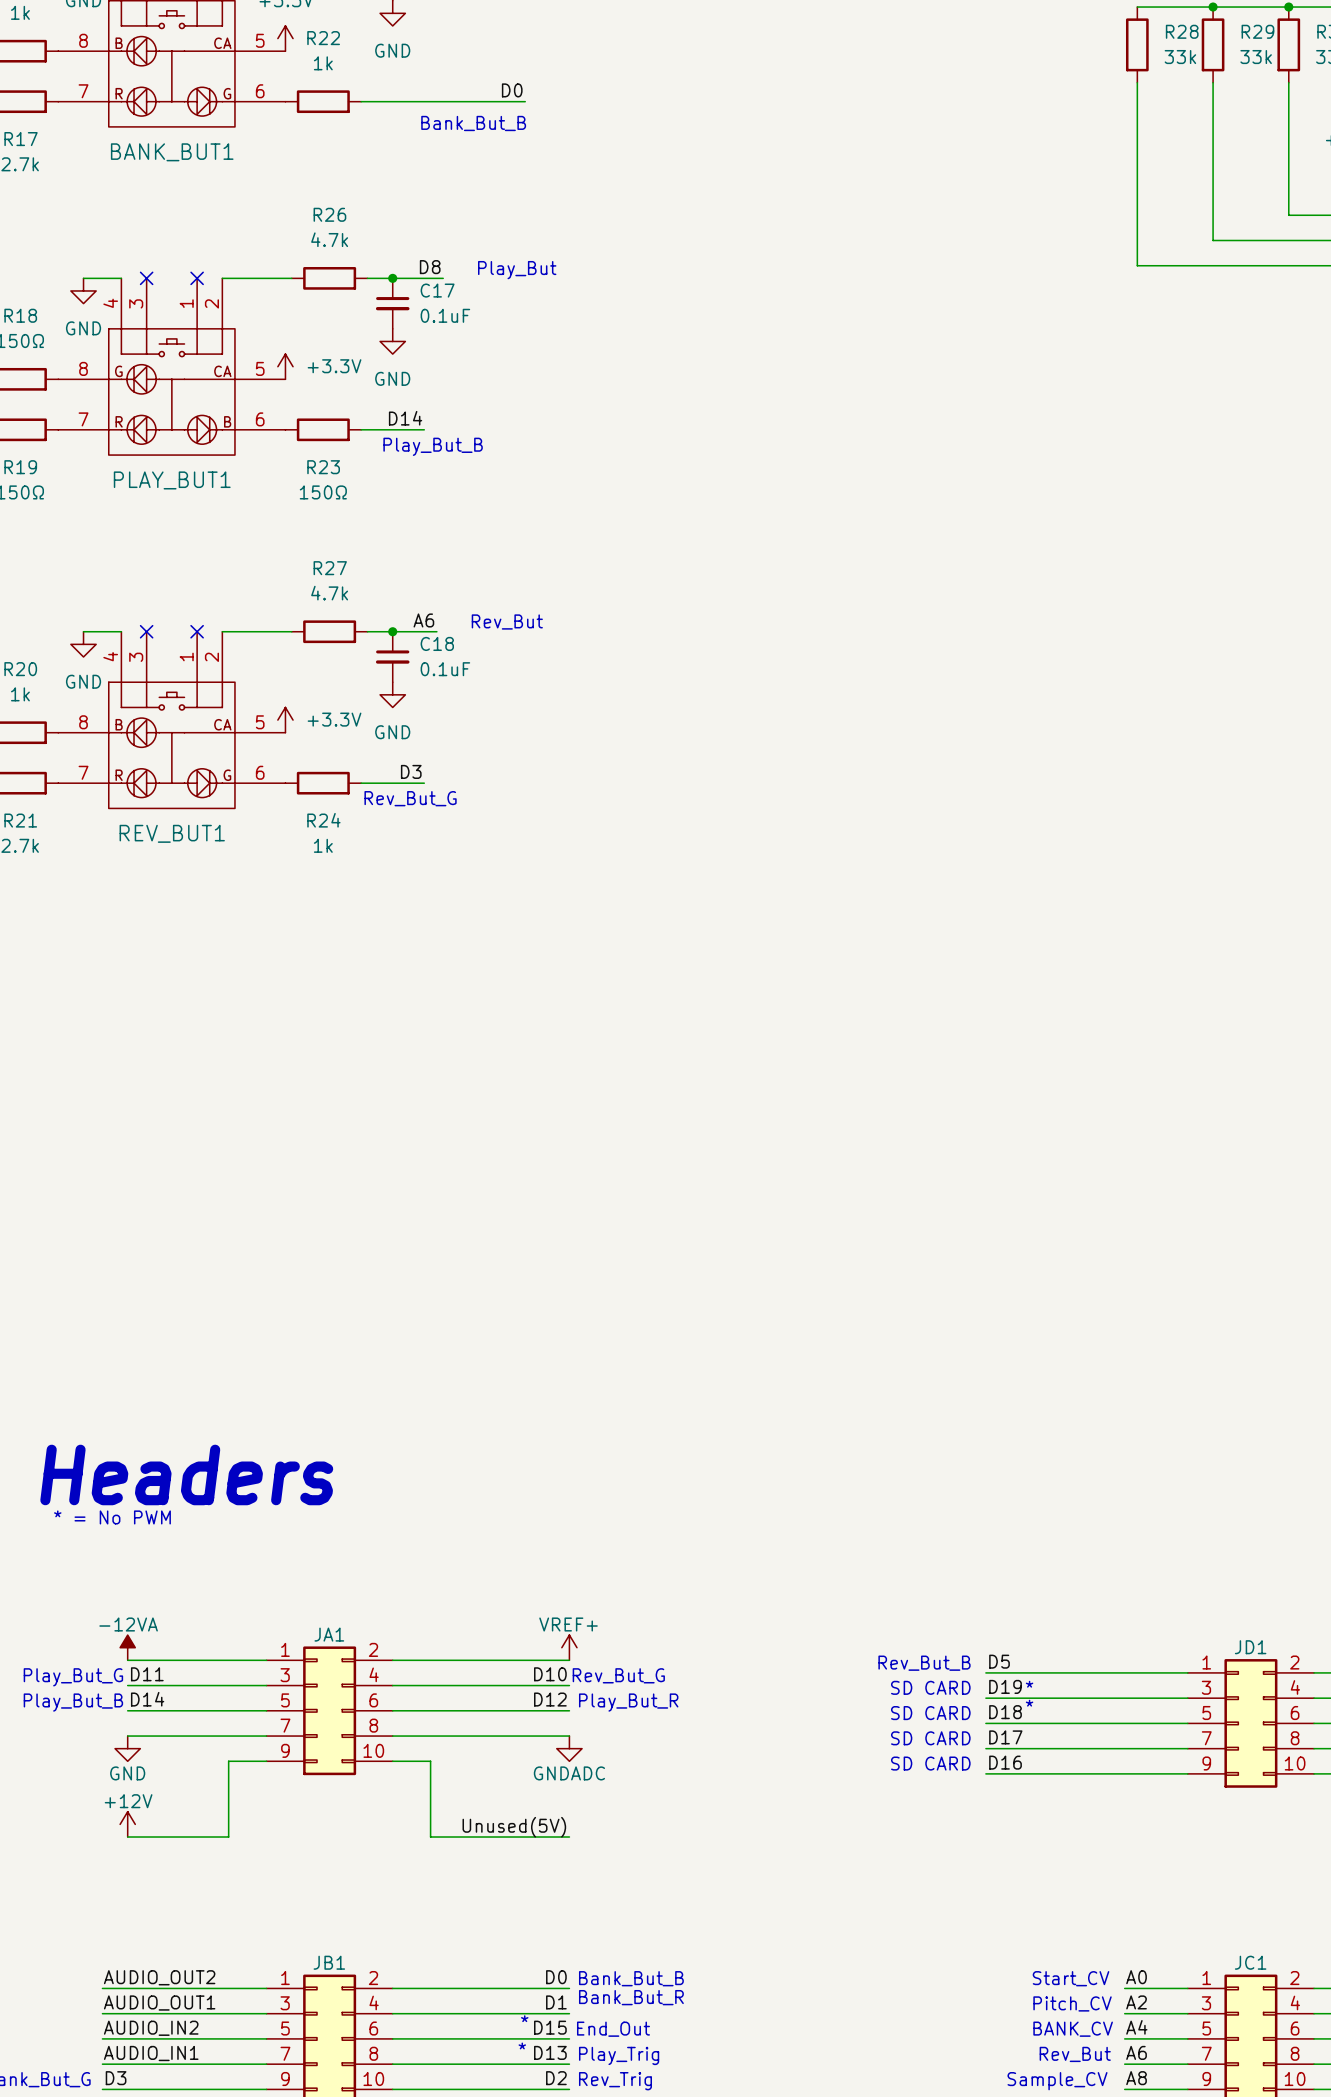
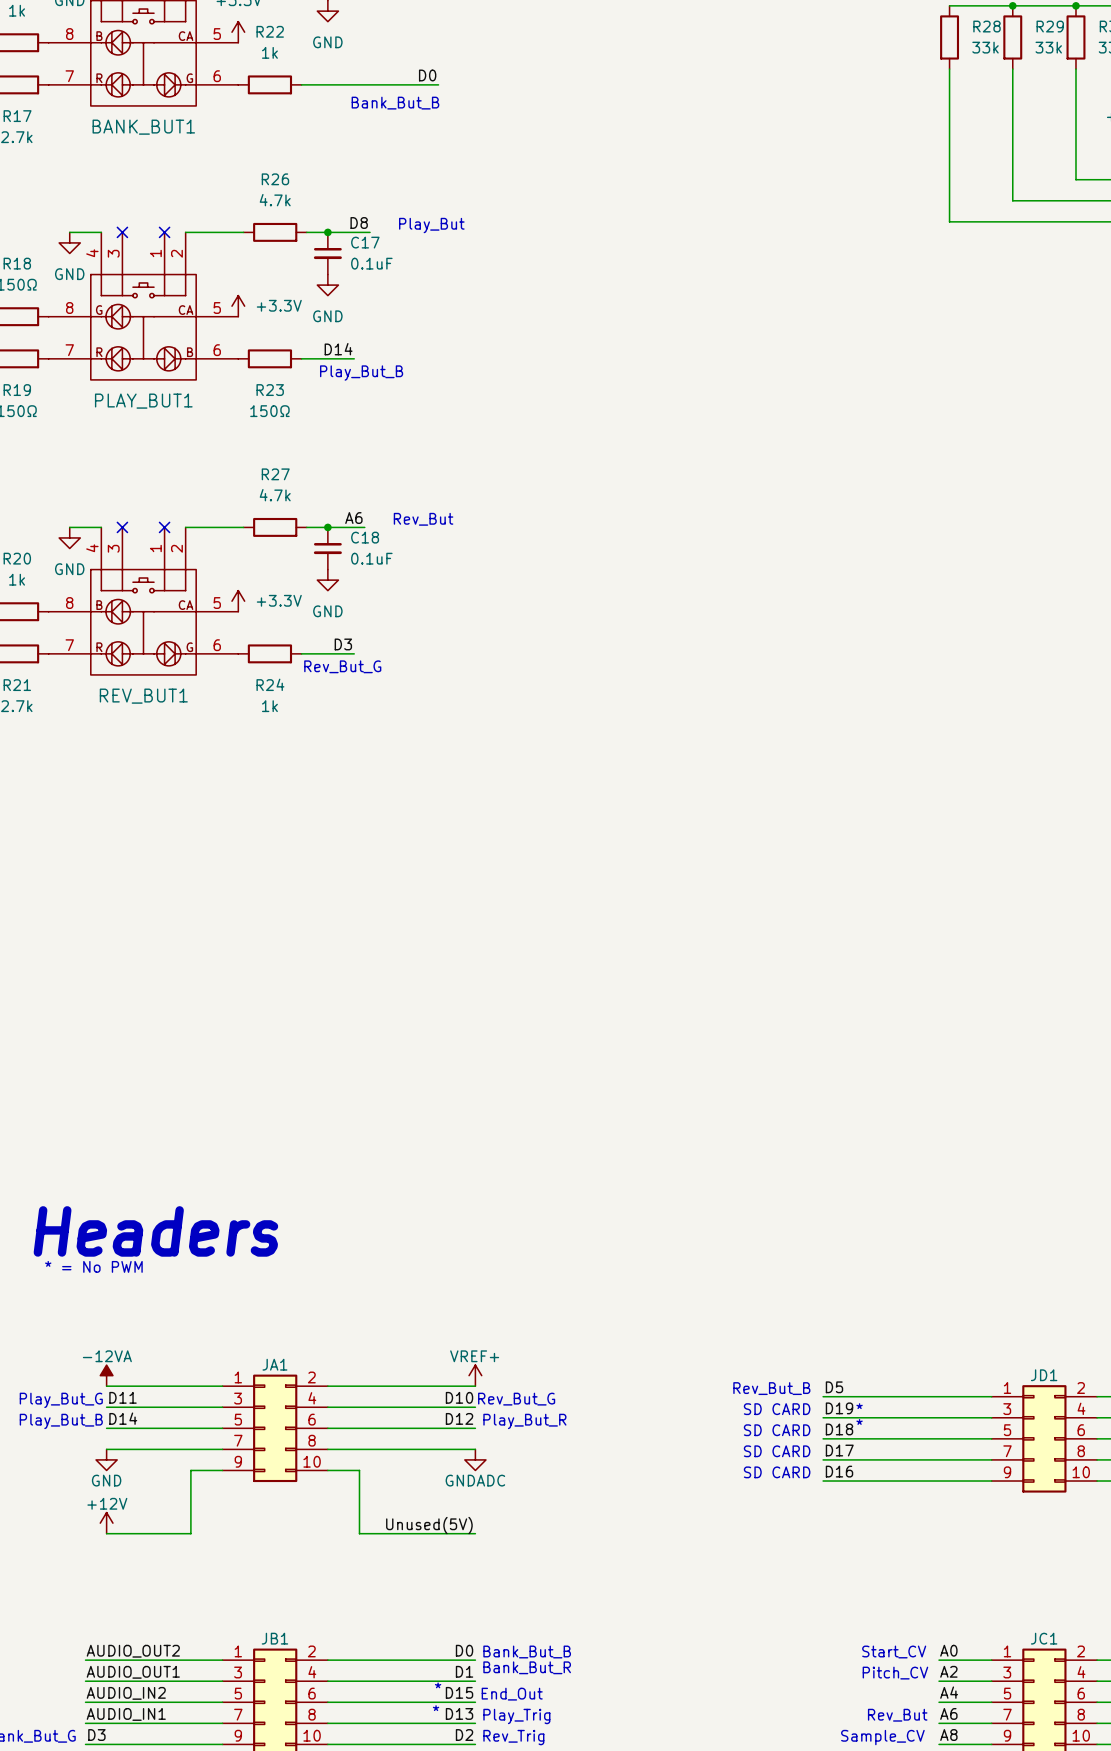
text: BANK_CV (1073, 2029) -> none

